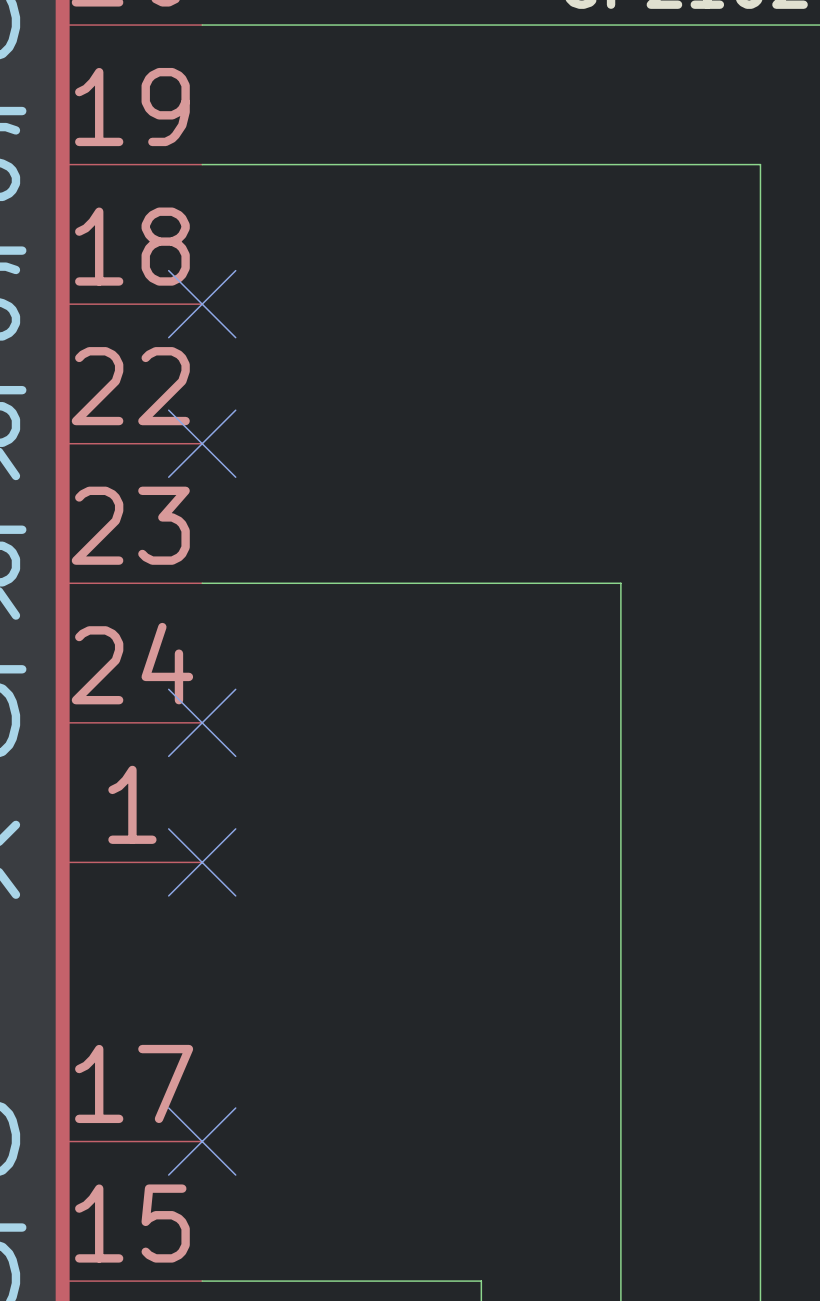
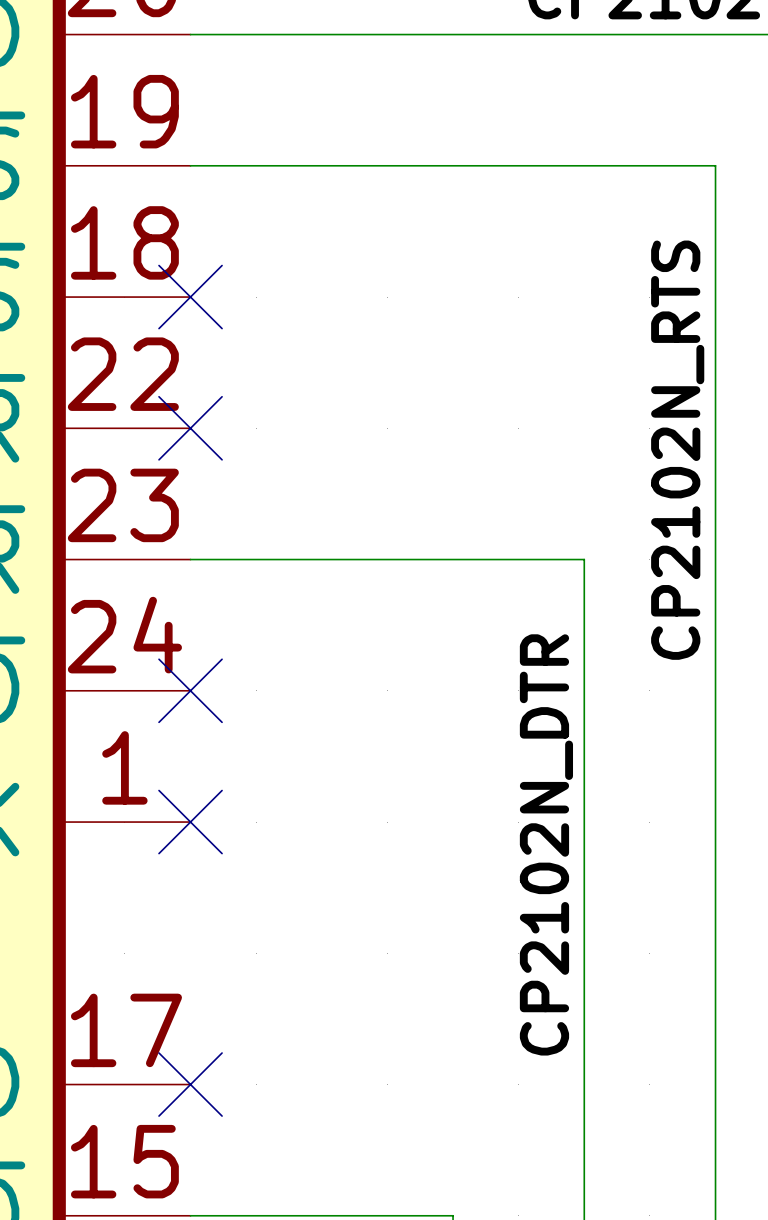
label: none -> CP2102N_RTS (677, 450)
label: none -> CP2102N_DTR (546, 844)

